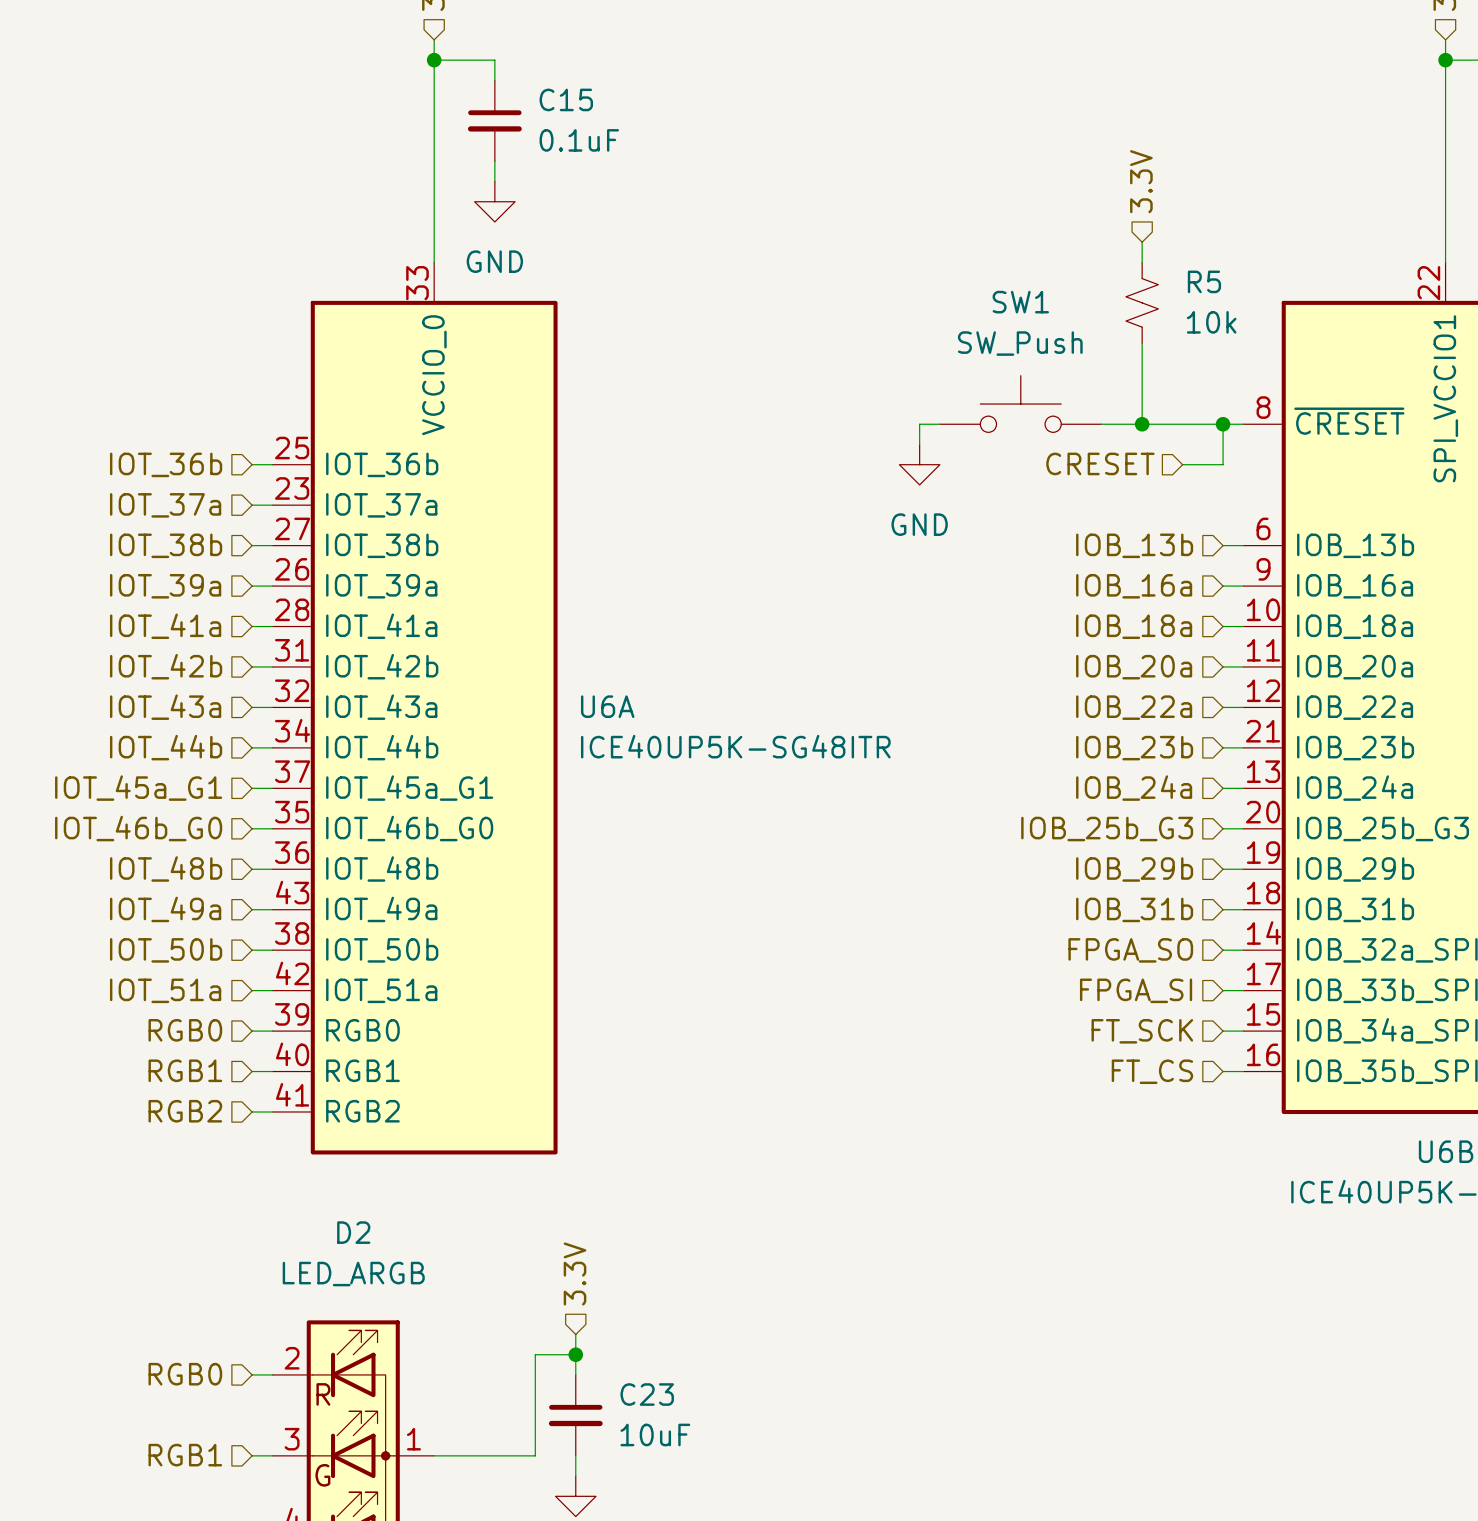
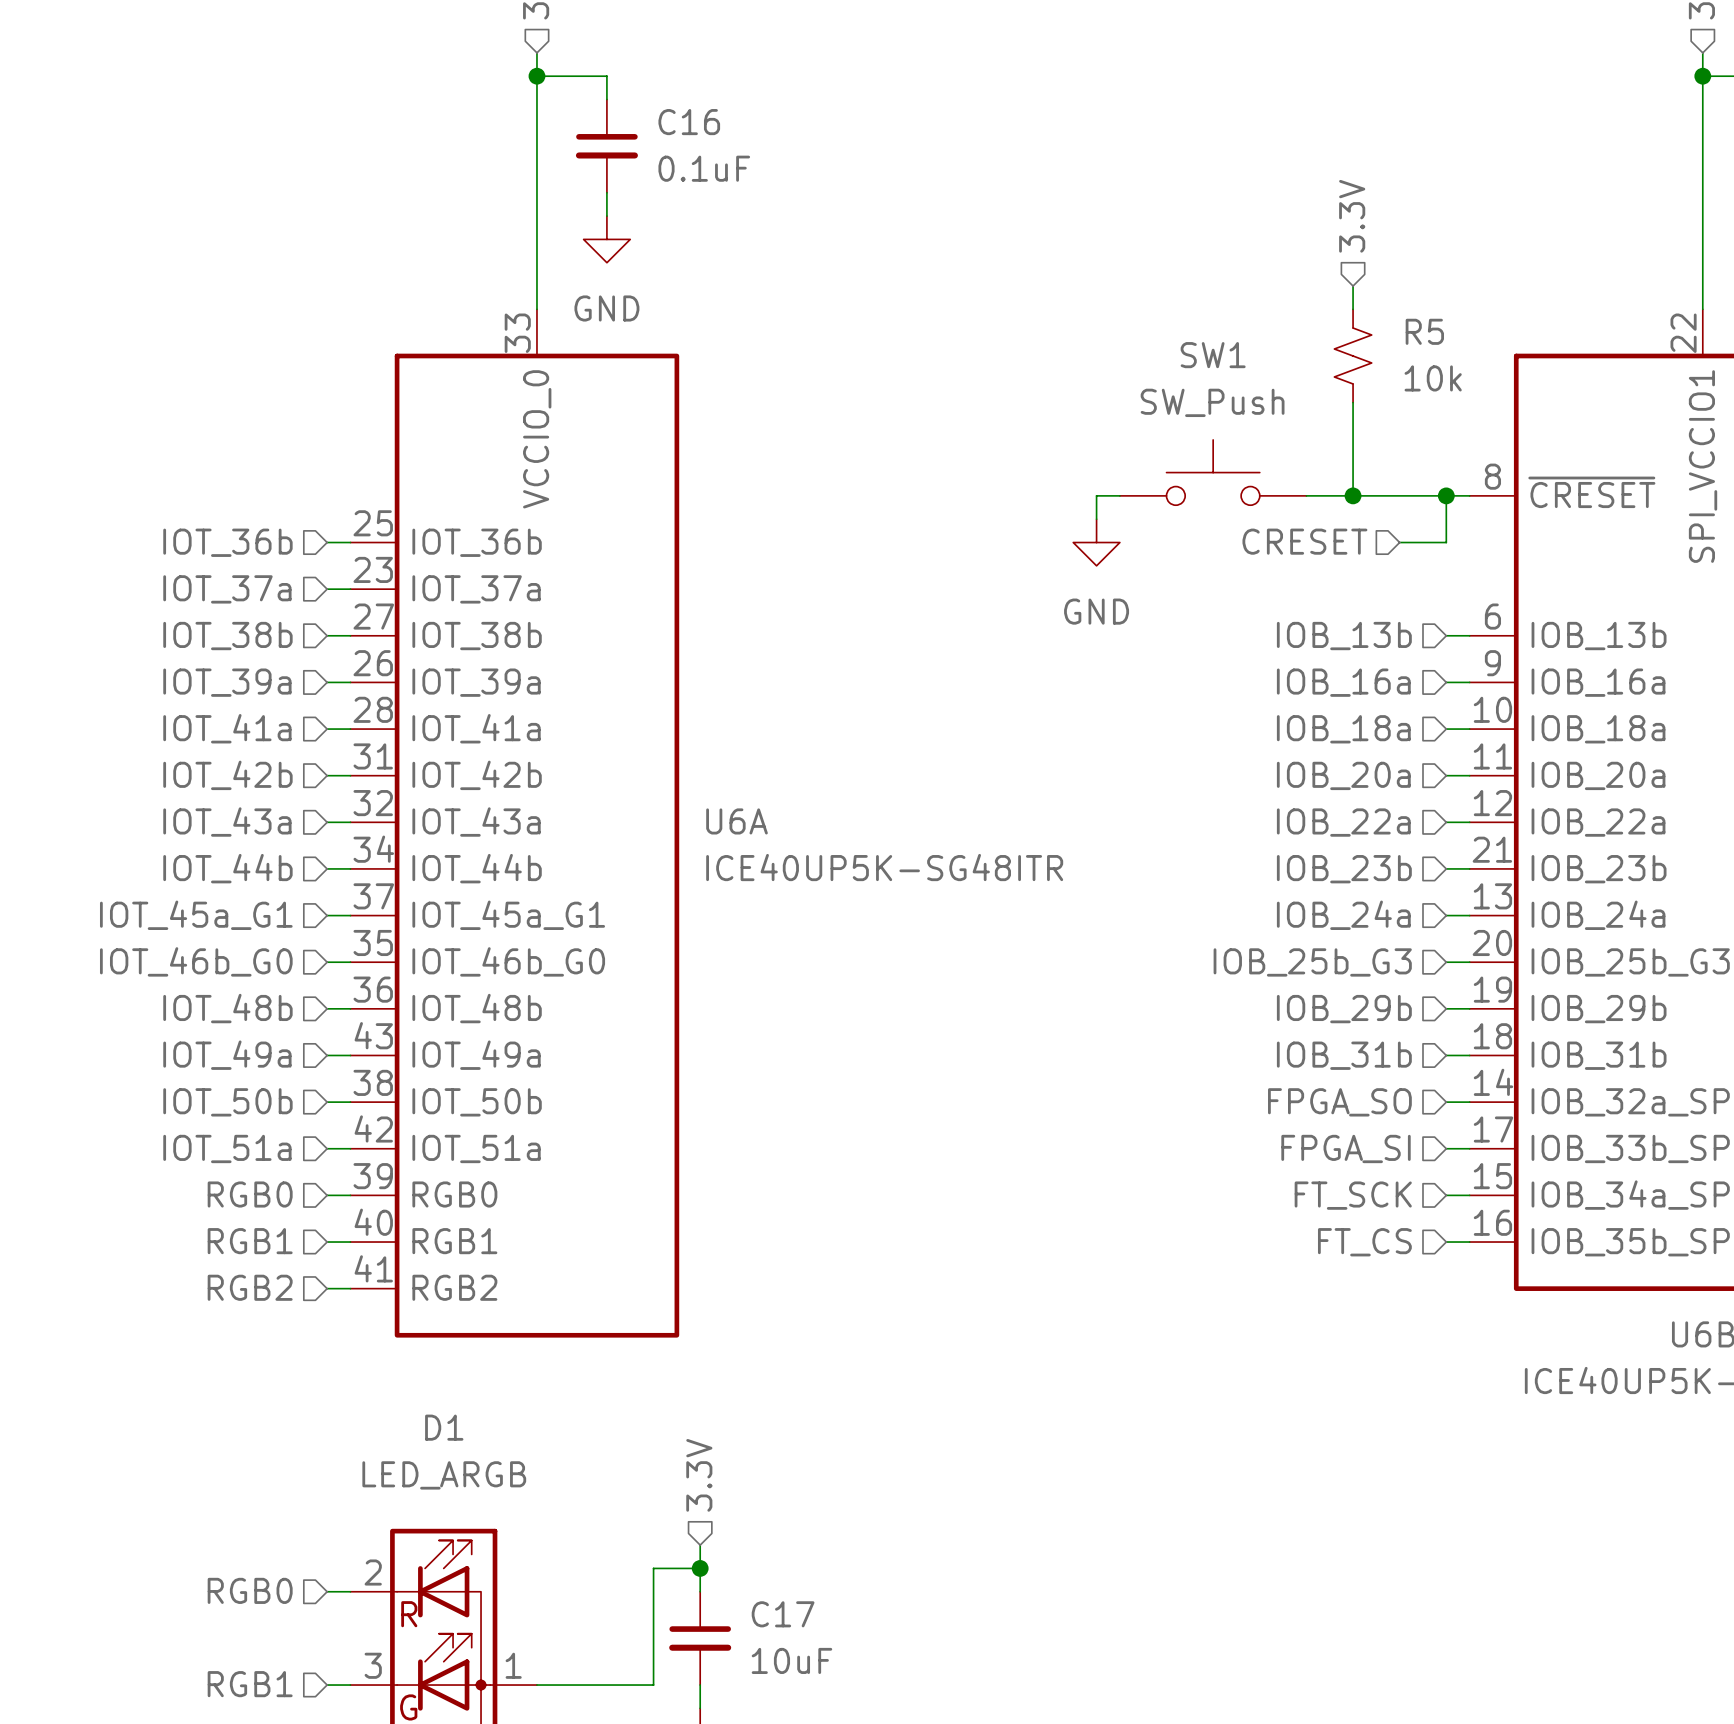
C15 name: C15 (566, 99) -> C16 (689, 122)
D2 name: D2 (353, 1232) -> D1 (444, 1427)
C23 name: C23 (647, 1394) -> C17 (783, 1614)

